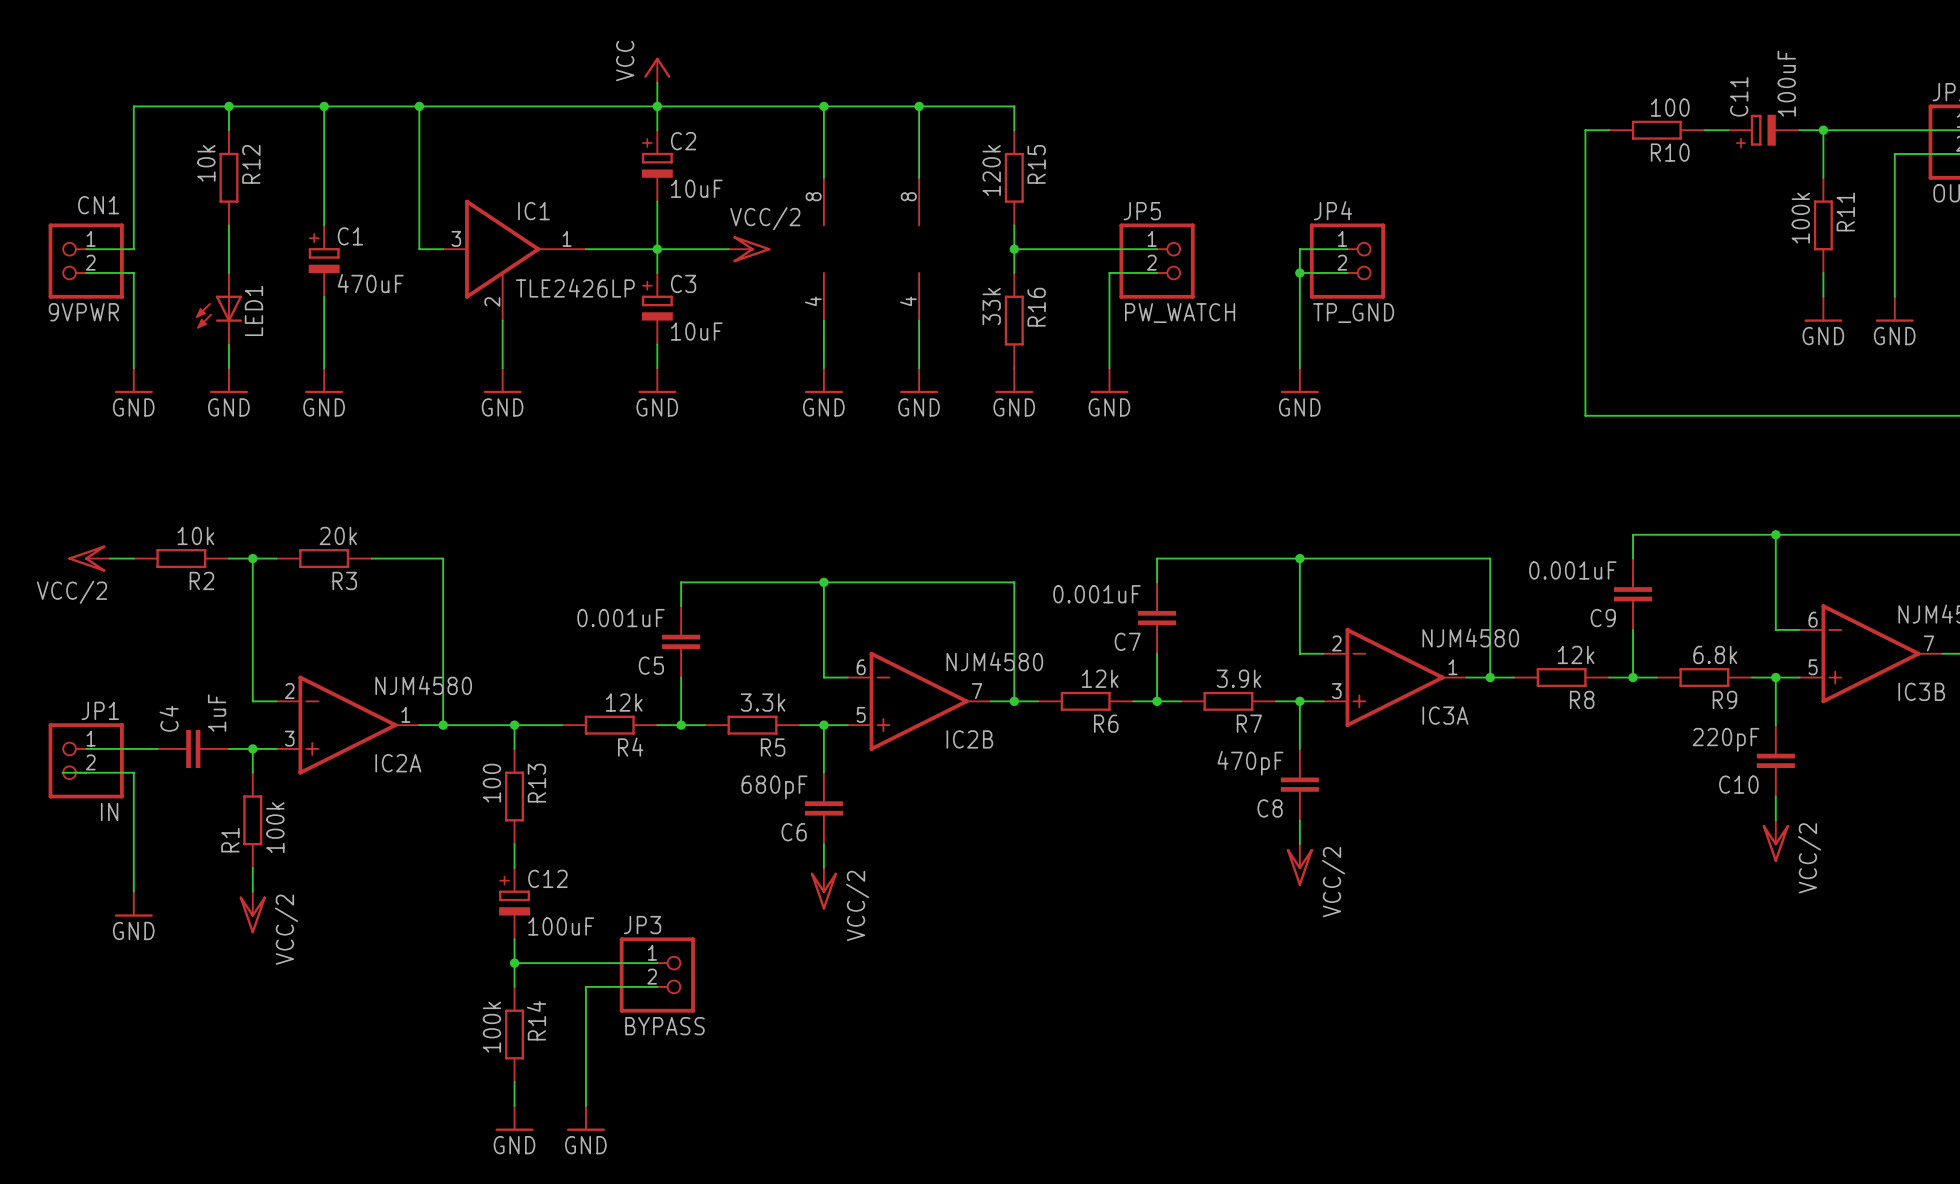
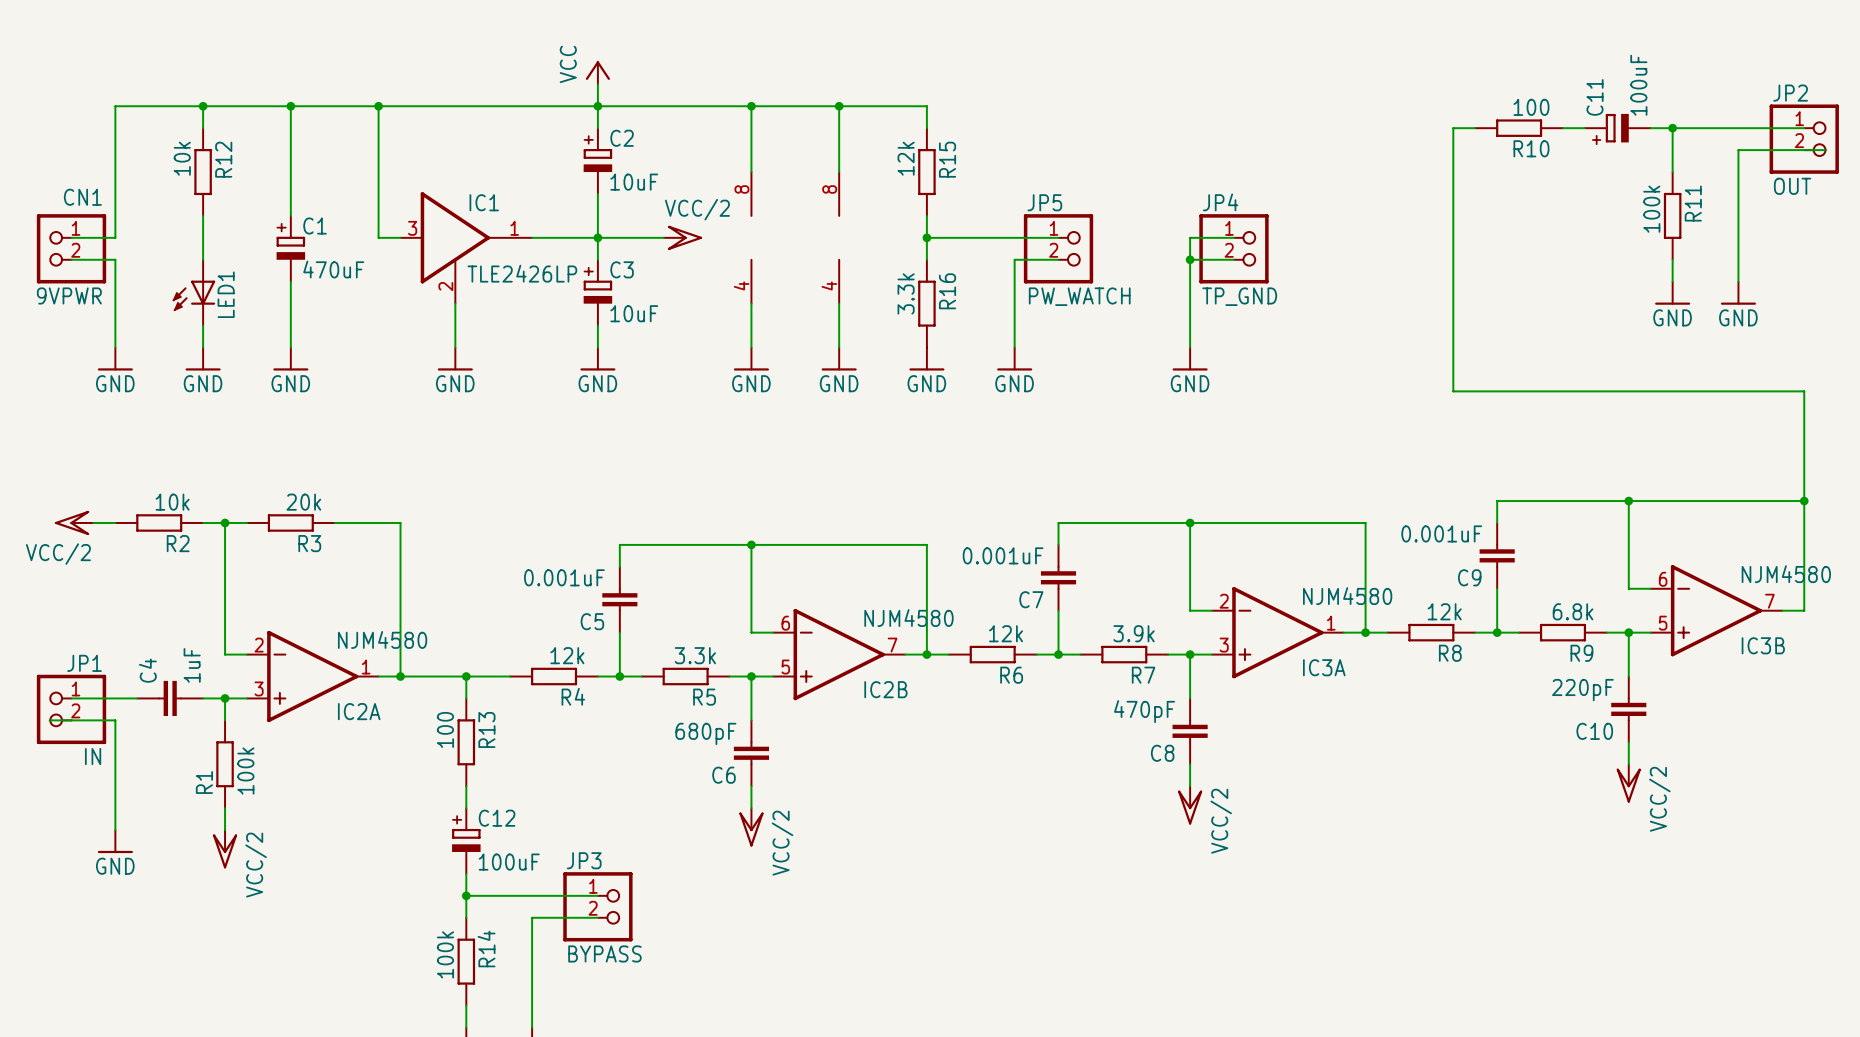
R15 value: 120k (991, 170) -> 12k (906, 158)
R16 value: 33k (991, 306) -> 3.3k (906, 293)

